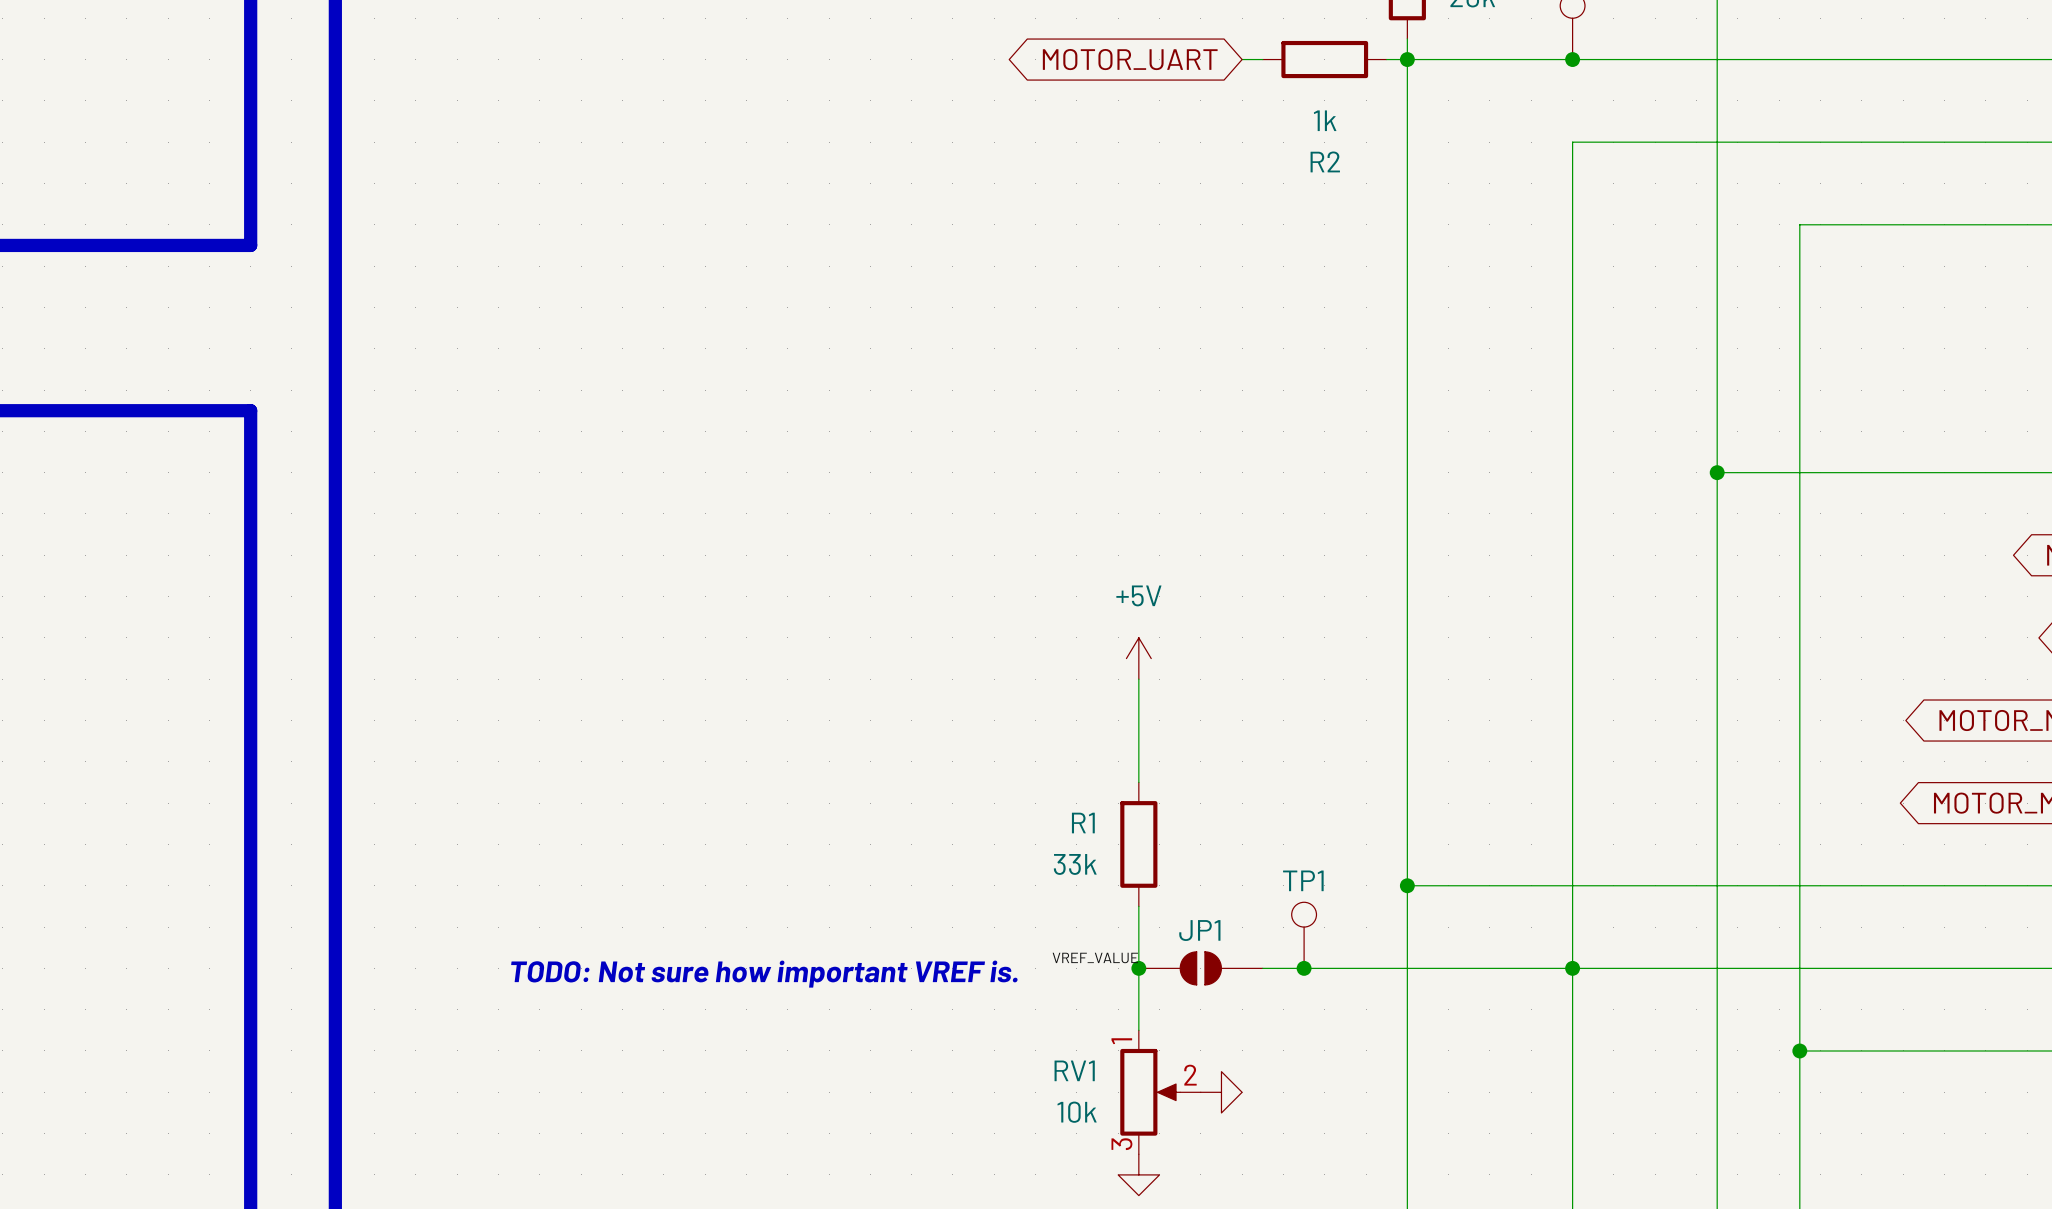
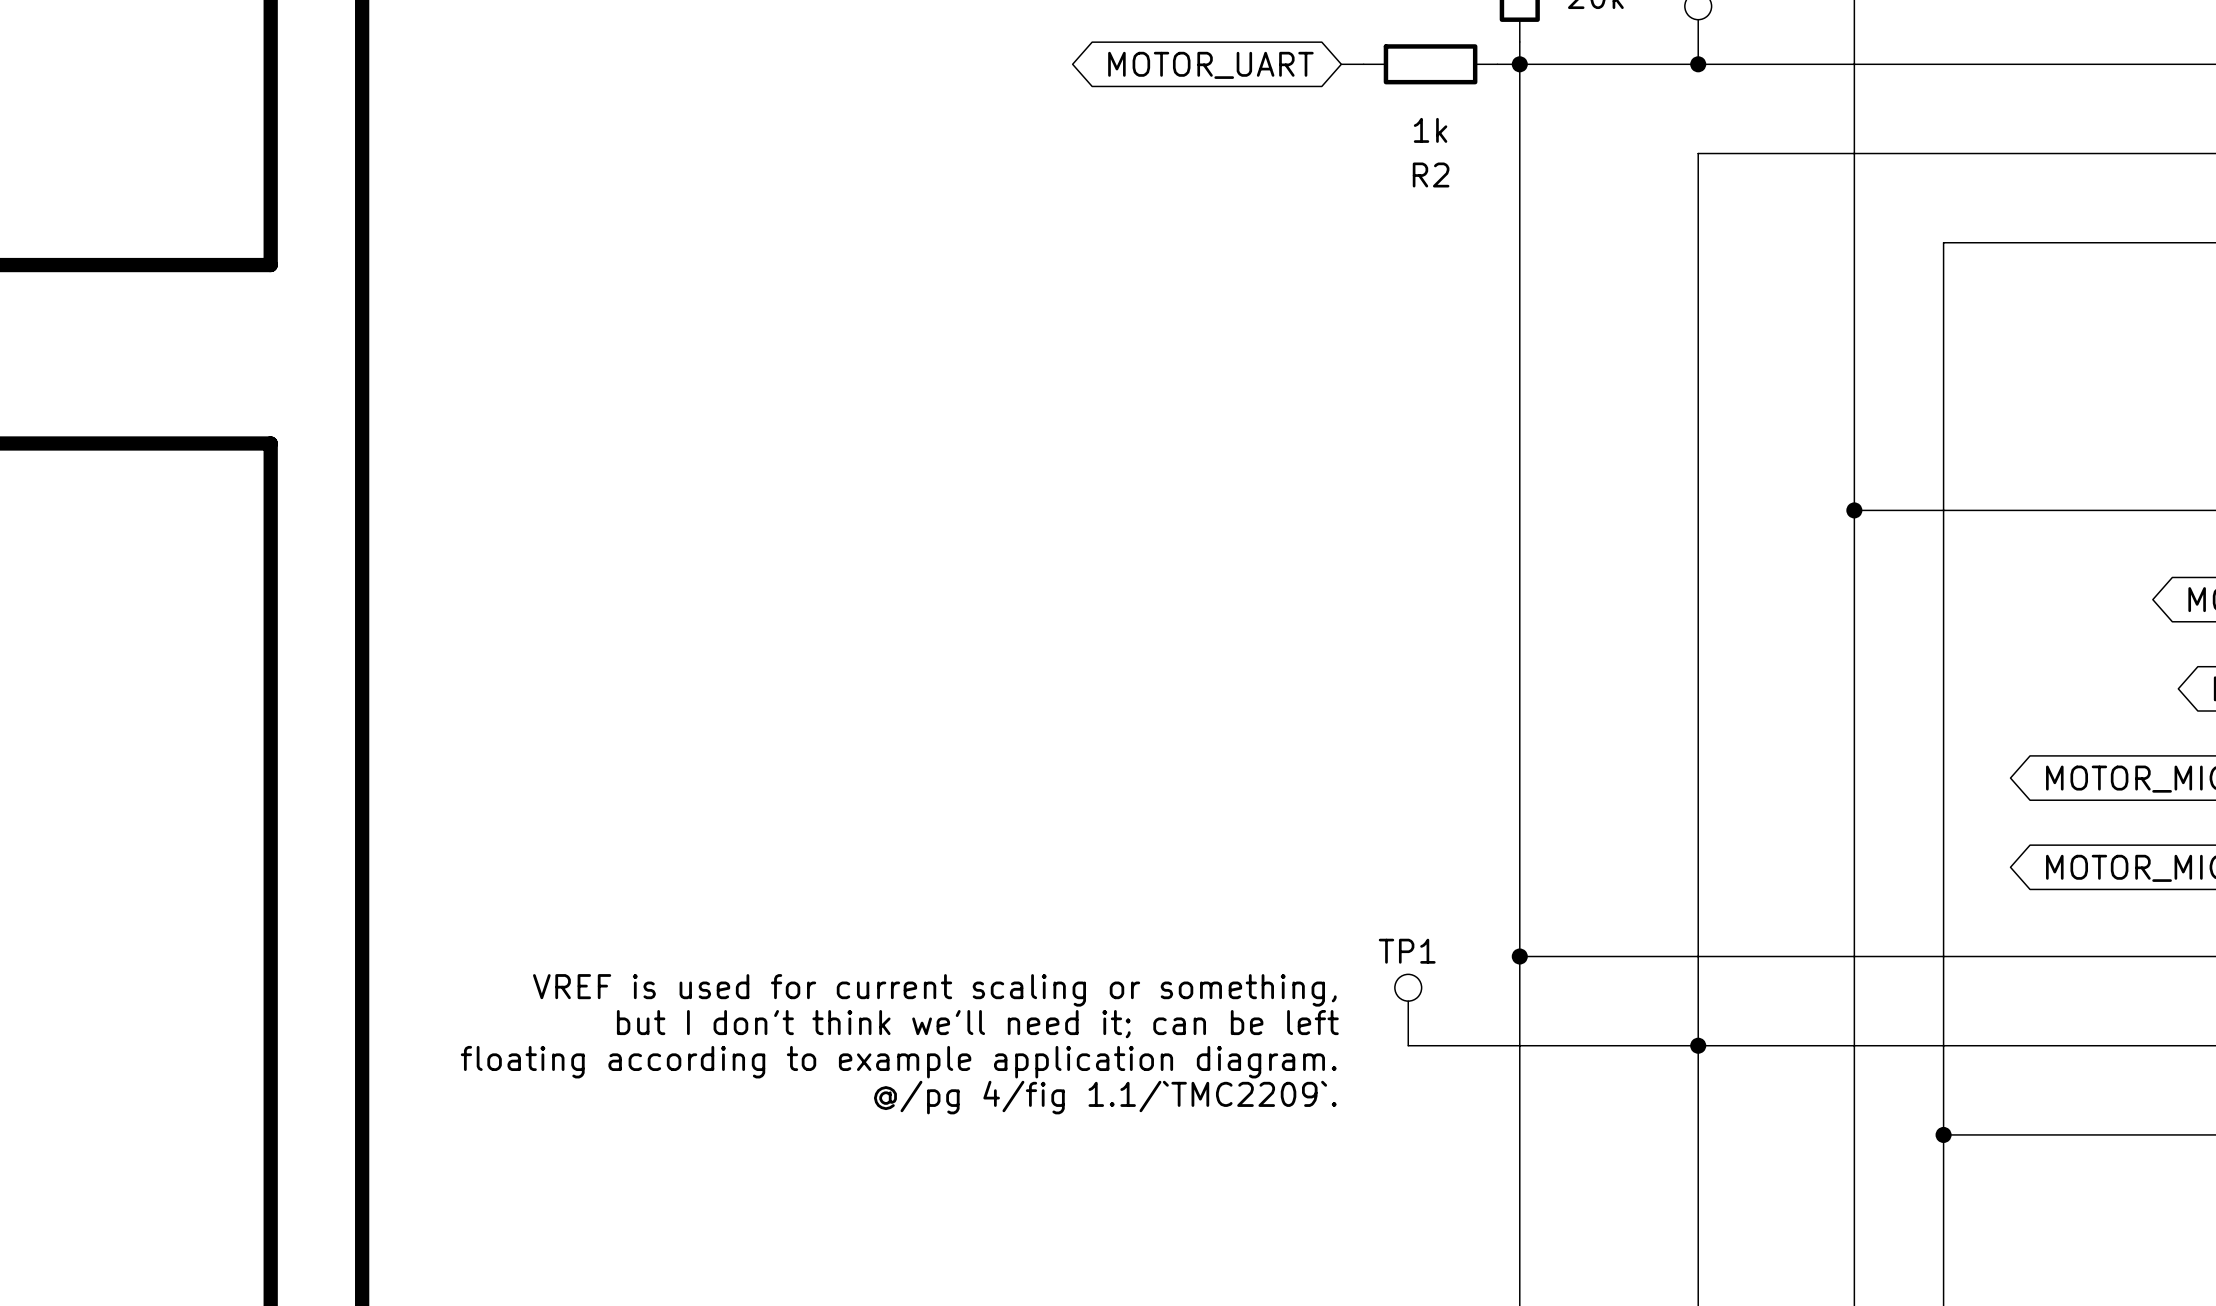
power symbol: +5V (1138, 658) -> none
wire: (1138, 679) (1138, 782) -> none
R1: 33k (1138, 844) -> none
wire: (1138, 906) (1138, 1030) -> none
text: none -> VREF is used for current scaling or something, (934, 990)
text: none -> but I don't think we'll need it; can be left (977, 1024)
label: VREF_VALUE (1095, 957) -> none
junction: (1138, 968) -> none
JP1: (1200, 968) -> none
wire: (1262, 968) (1304, 968) -> none
junction: (1304, 968) -> none
text: TODO: Not sure how important VREF is. (764, 974) -> none
text: none -> floating according to example application diagram. (898, 1062)
text: none -> @/pg 4/fig 1.1/`TMC2209`. (1105, 1097)
RV1: 10k (1160, 1092) -> none
power symbol: (1221, 1092) -> none
power symbol: (1138, 1174) -> none

